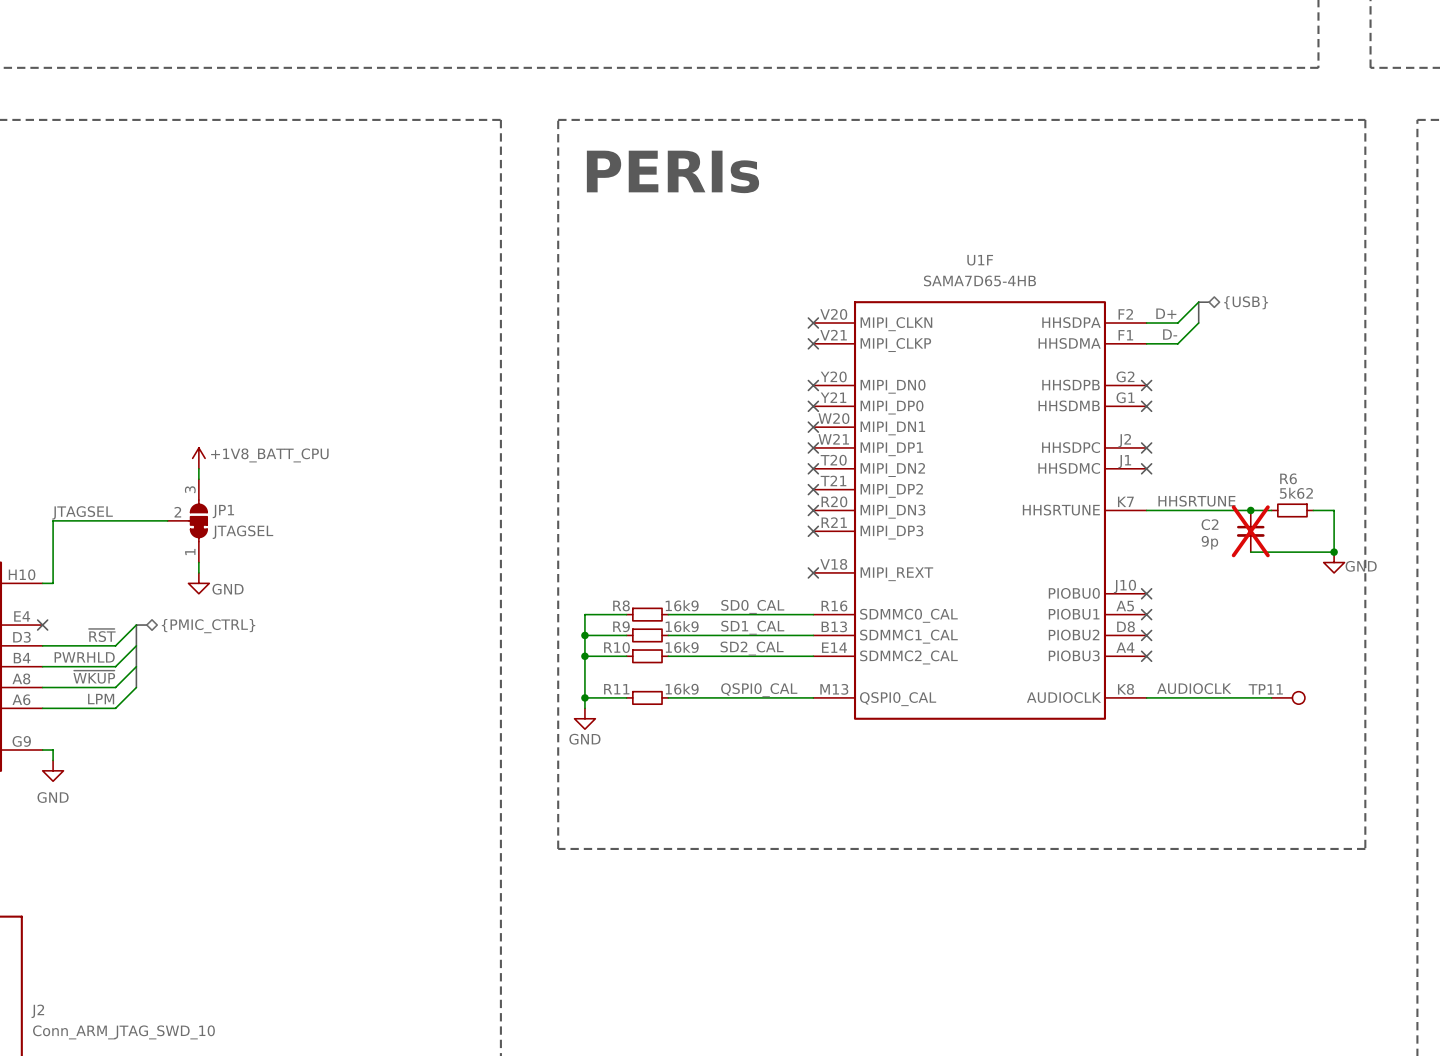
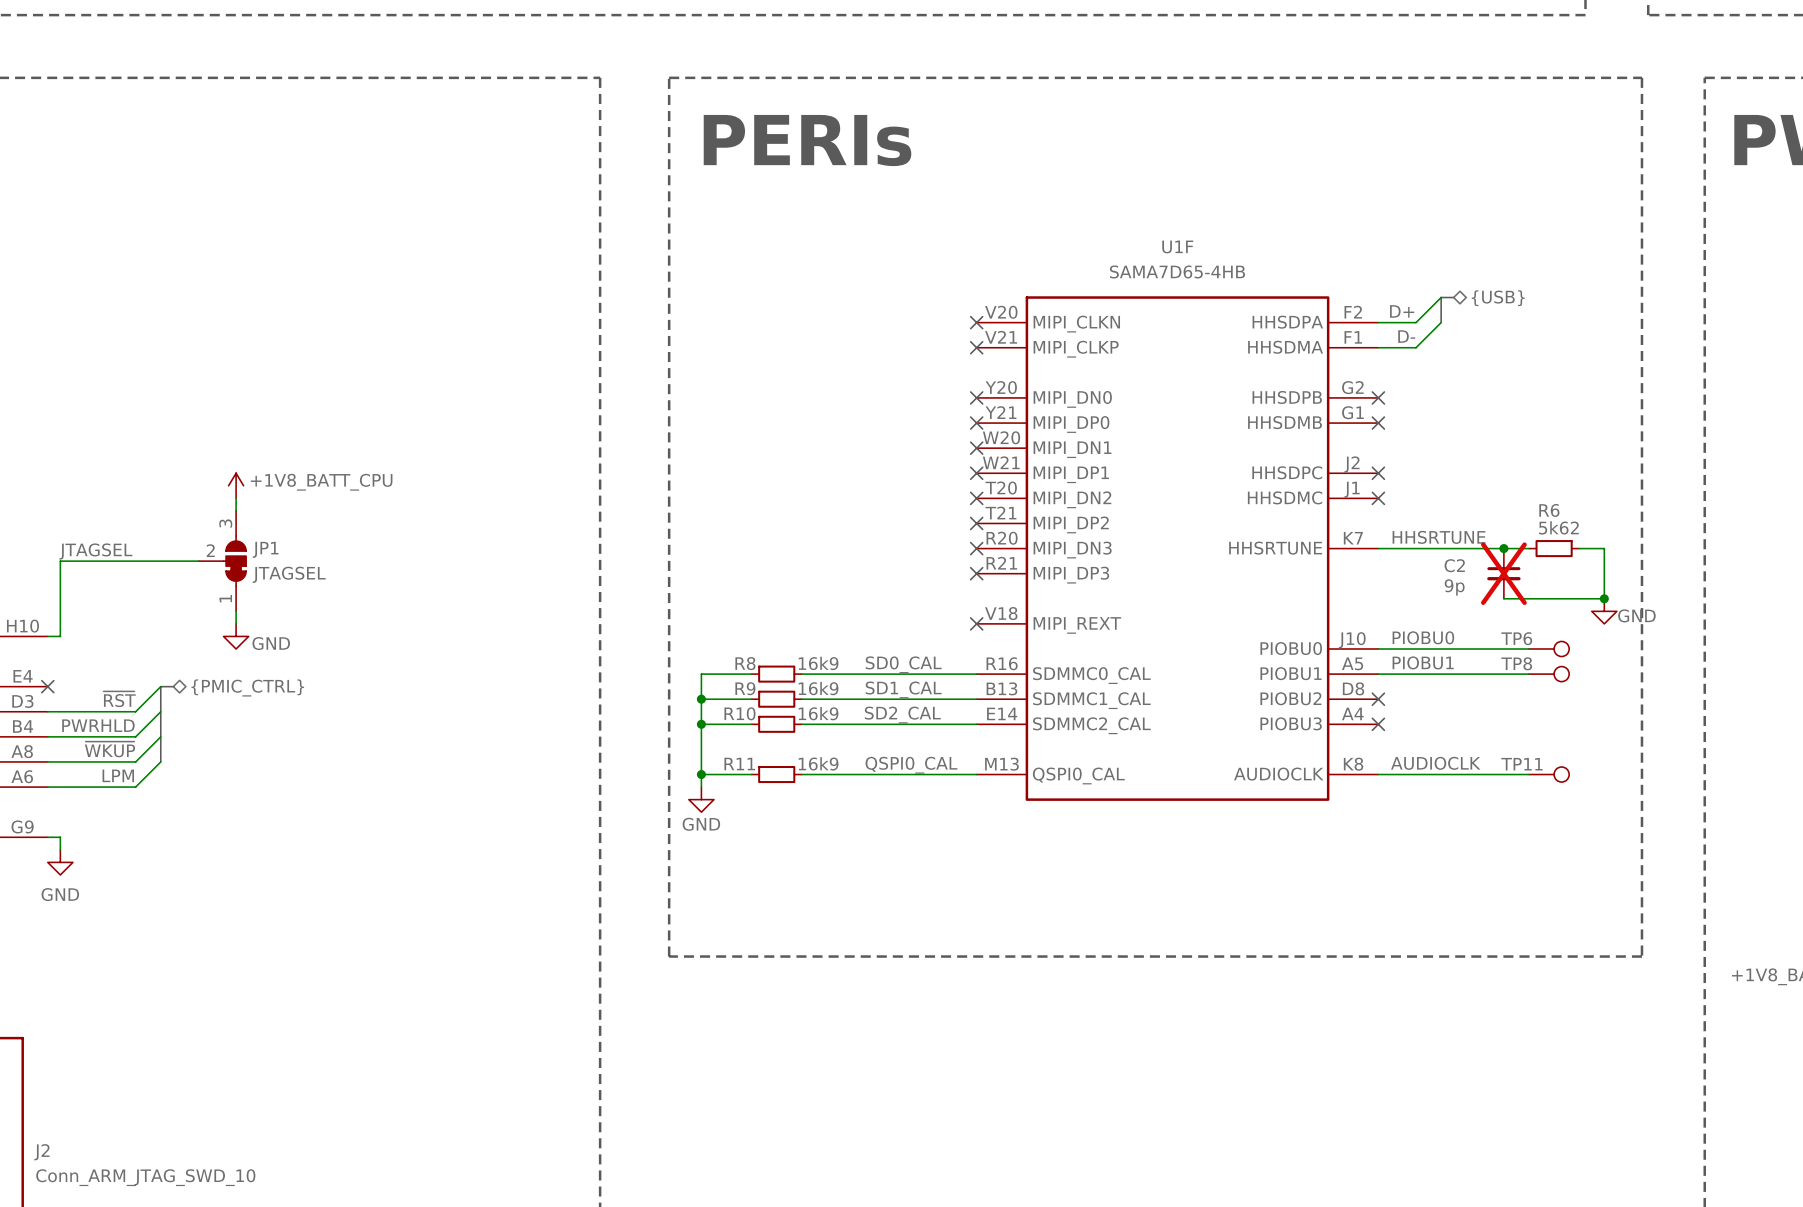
label: none -> PIOBU0 (1423, 637)
wire: none -> (1378, 649) (1529, 649)
no-connect mark: (1146, 593) -> none
TP6: none -> (1549, 649)
label: none -> PIOBU1 (1423, 662)
wire: none -> (1378, 674) (1529, 674)
no-connect mark: (1146, 614) -> none
TP8: none -> (1549, 674)

